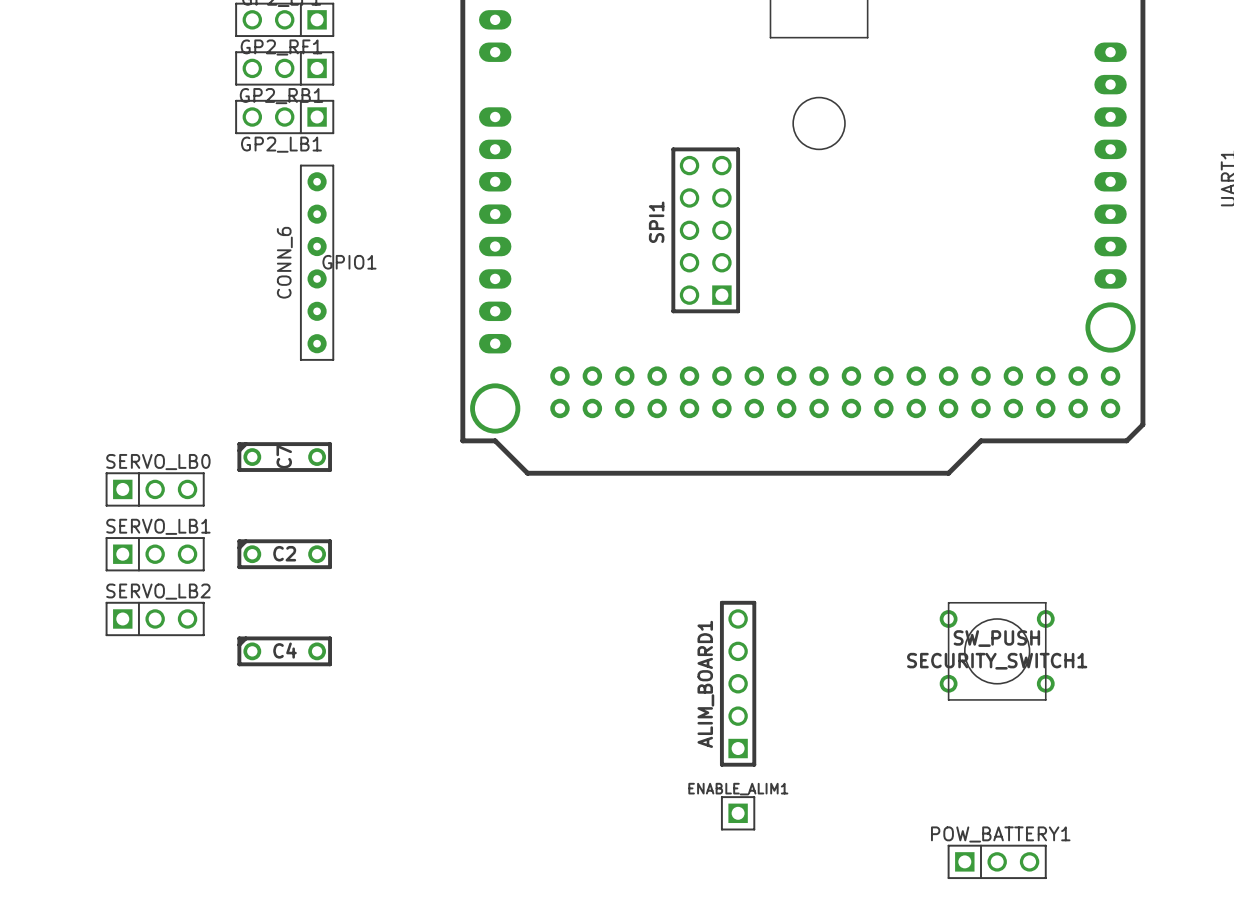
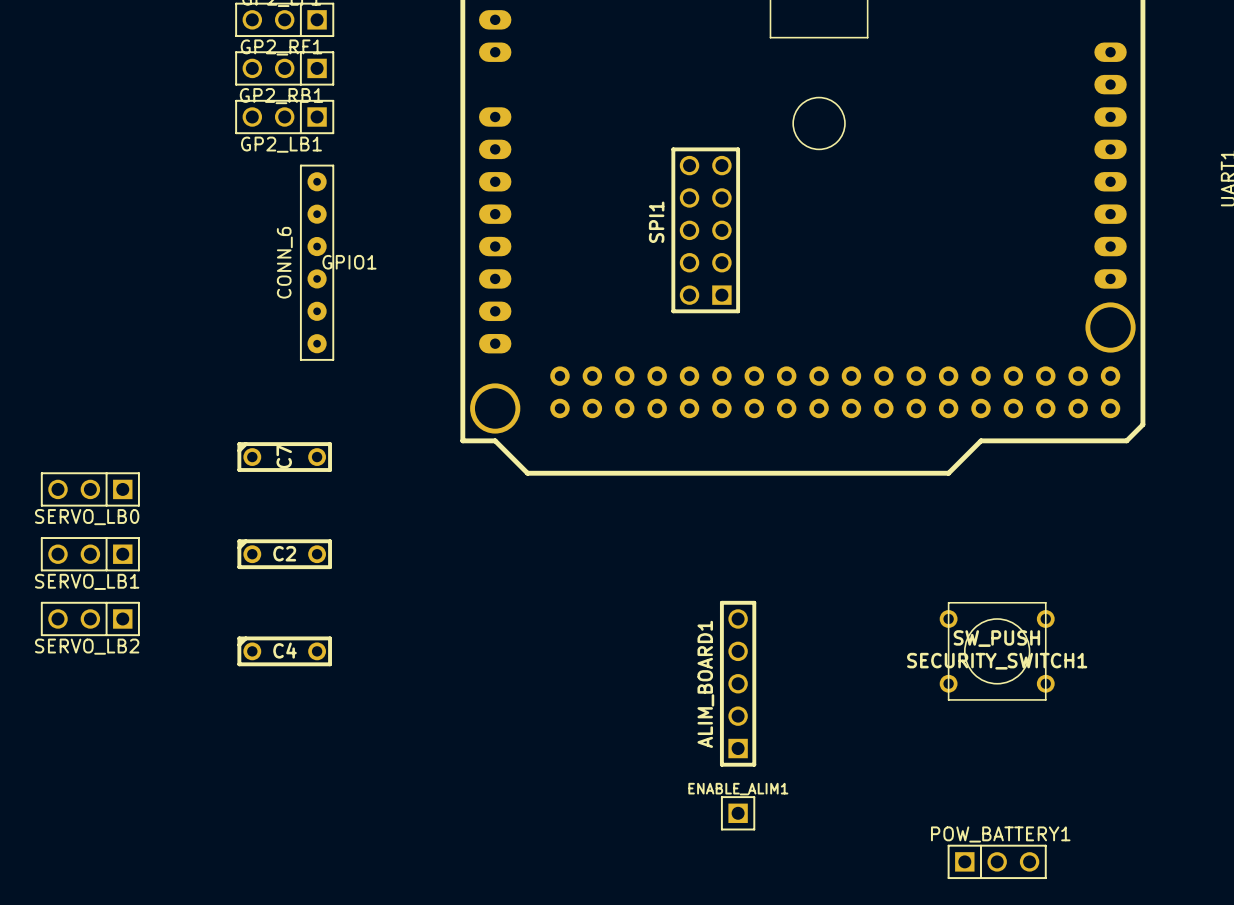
SERVO_LB0 rotation: 0° (155, 489) -> 180° (90, 489)
SERVO_LB0 position: (155, 489) -> (90, 489)
SERVO_LB1 rotation: 0° (155, 554) -> 180° (90, 554)
SERVO_LB1 position: (155, 554) -> (90, 554)
SERVO_LB2 rotation: 0° (155, 618) -> 180° (90, 618)
SERVO_LB2 position: (155, 618) -> (90, 618)

